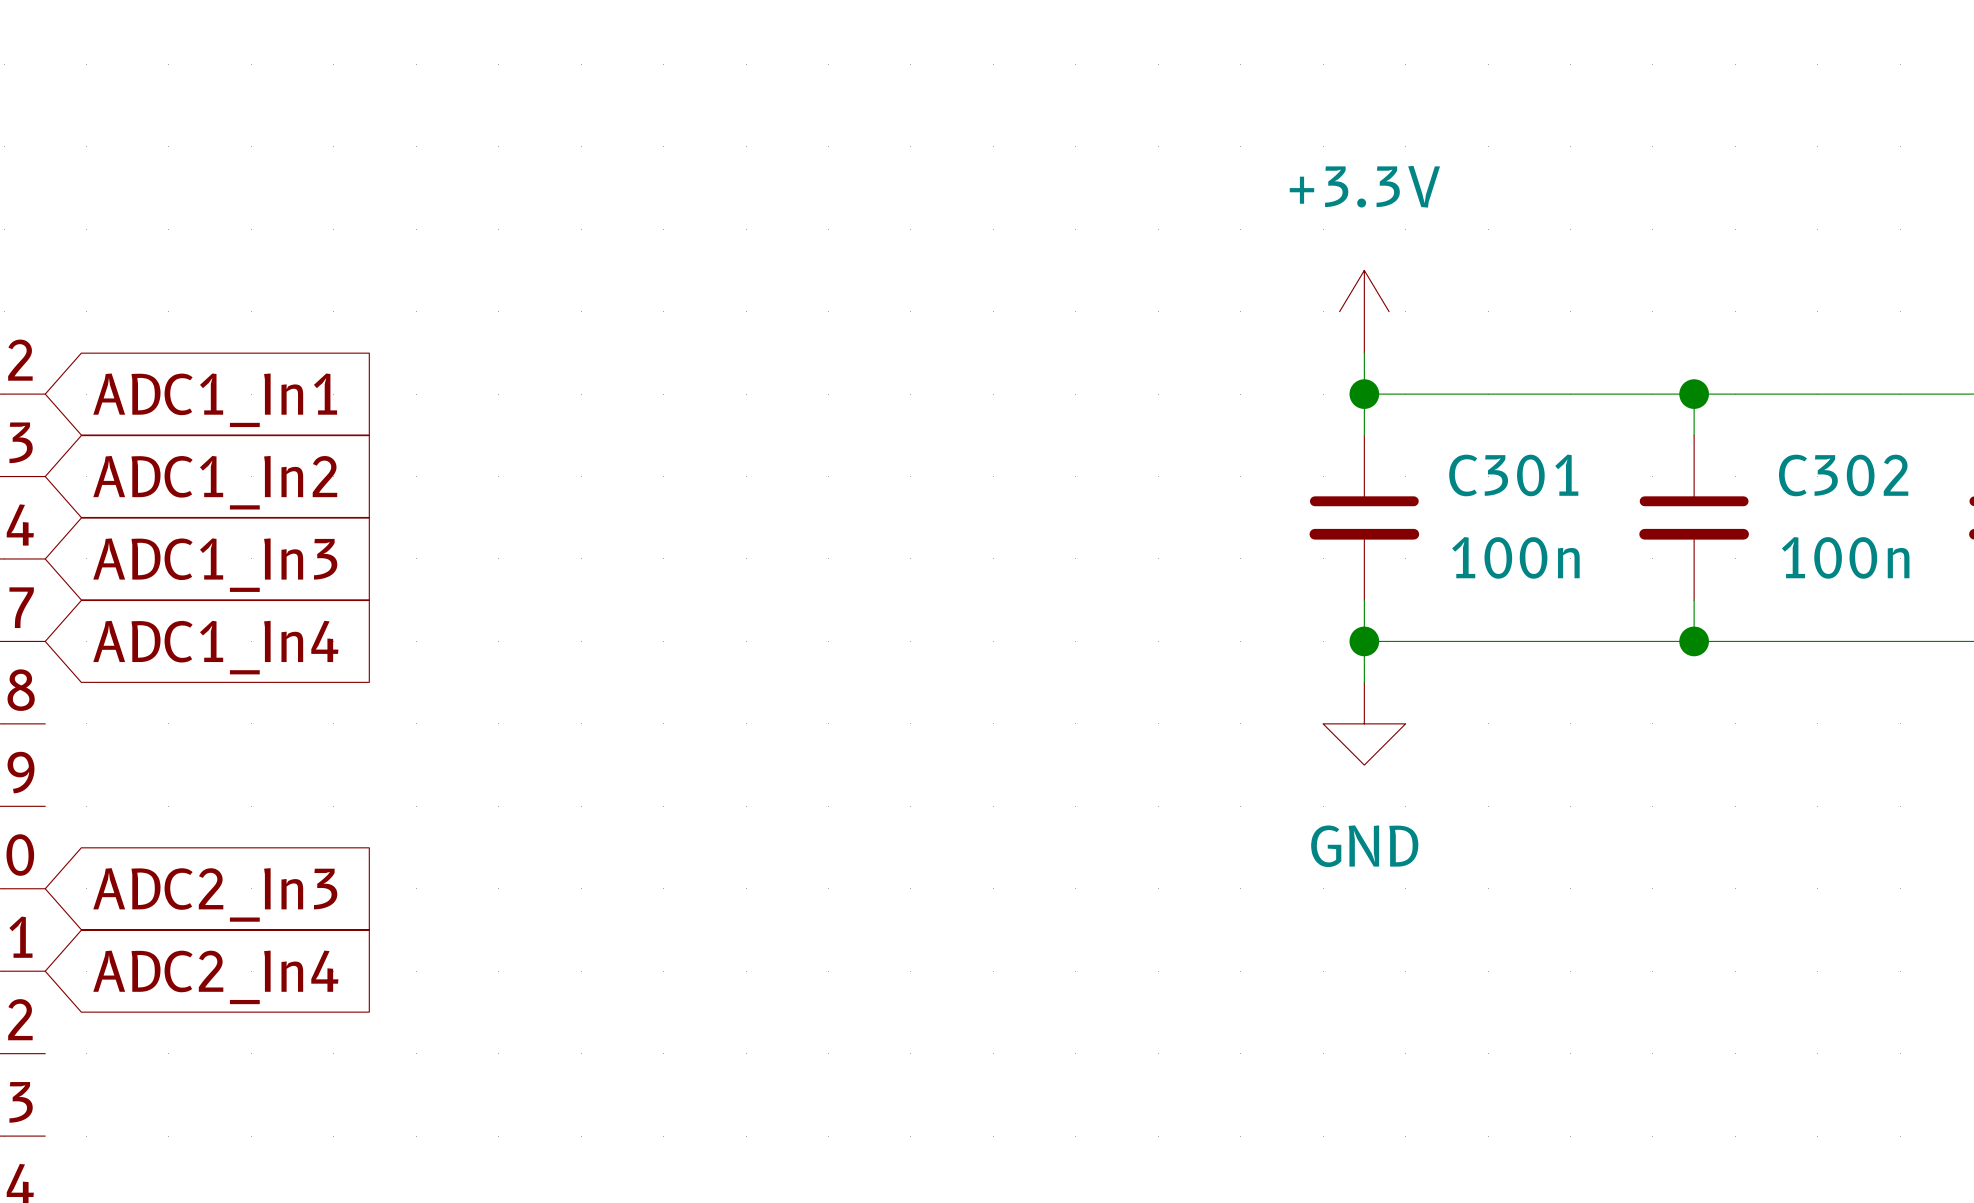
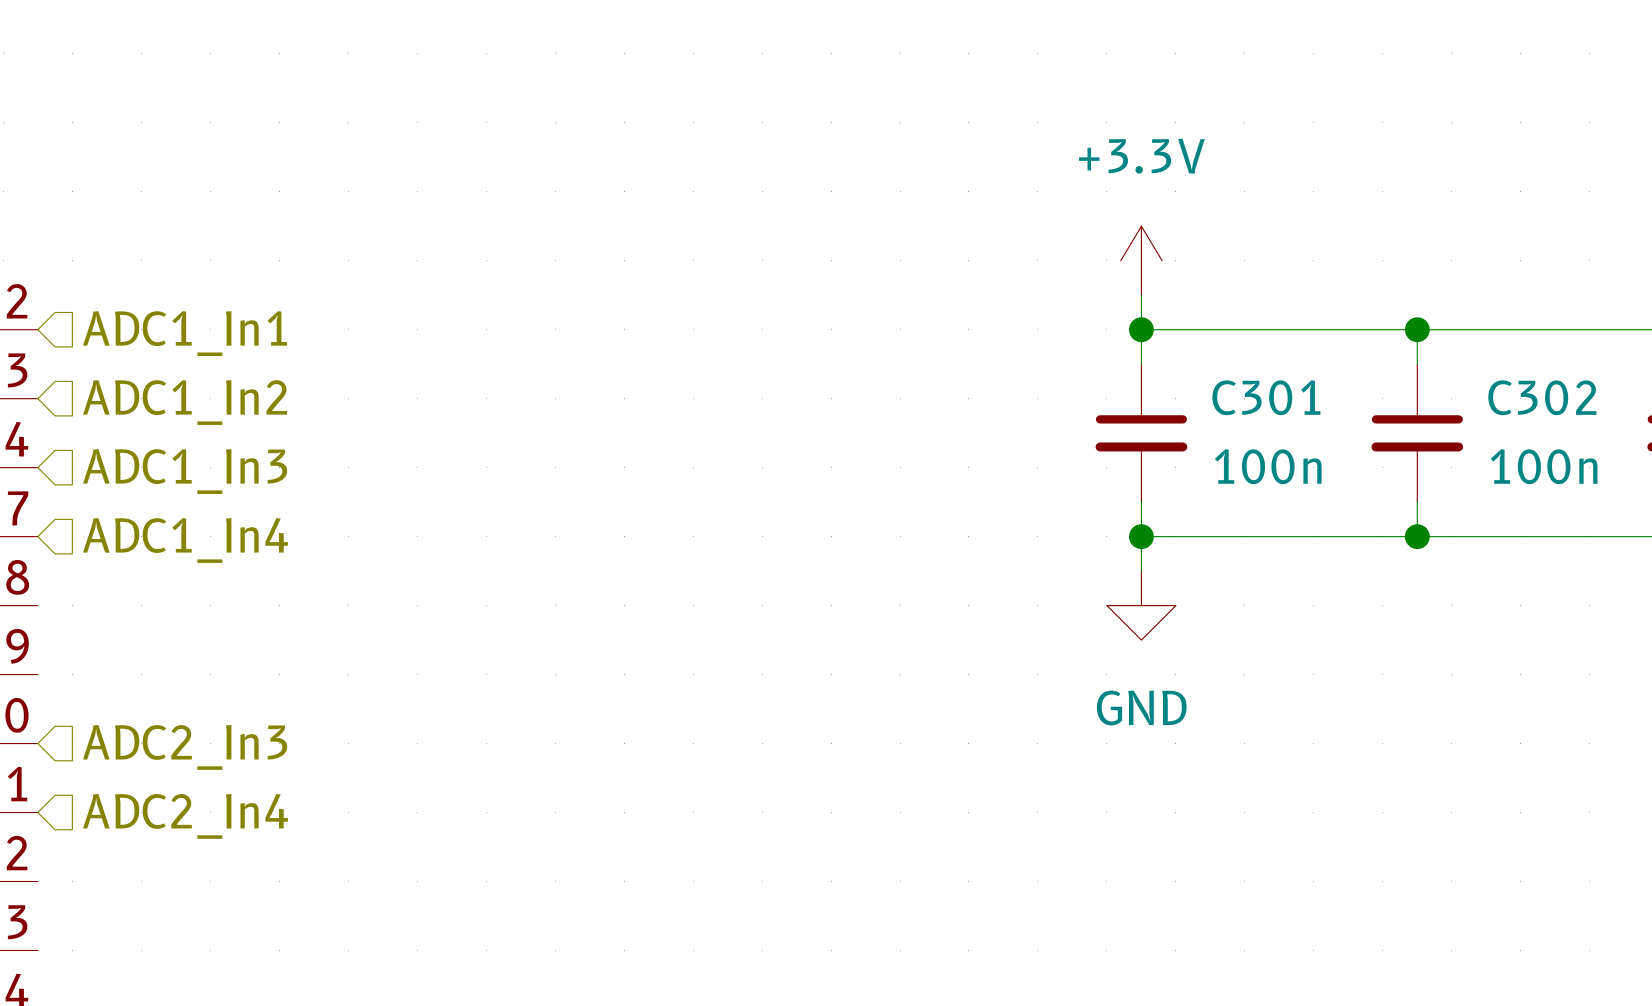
hierarchical label: none -> ADC1_In1 (185, 333)
global label: ADC1_In1 (215, 400) -> none
hierarchical label: none -> ADC1_In2 (185, 402)
global label: ADC1_In2 (215, 482) -> none
hierarchical label: none -> ADC1_In3 (185, 471)
global label: ADC1_In3 (215, 565) -> none
hierarchical label: none -> ADC1_In4 (185, 540)
global label: ADC1_In4 (215, 647) -> none
hierarchical label: none -> ADC2_In3 (185, 747)
global label: ADC2_In3 (215, 894) -> none
hierarchical label: none -> ADC2_In4 (185, 816)
global label: ADC2_In4 (215, 977) -> none

